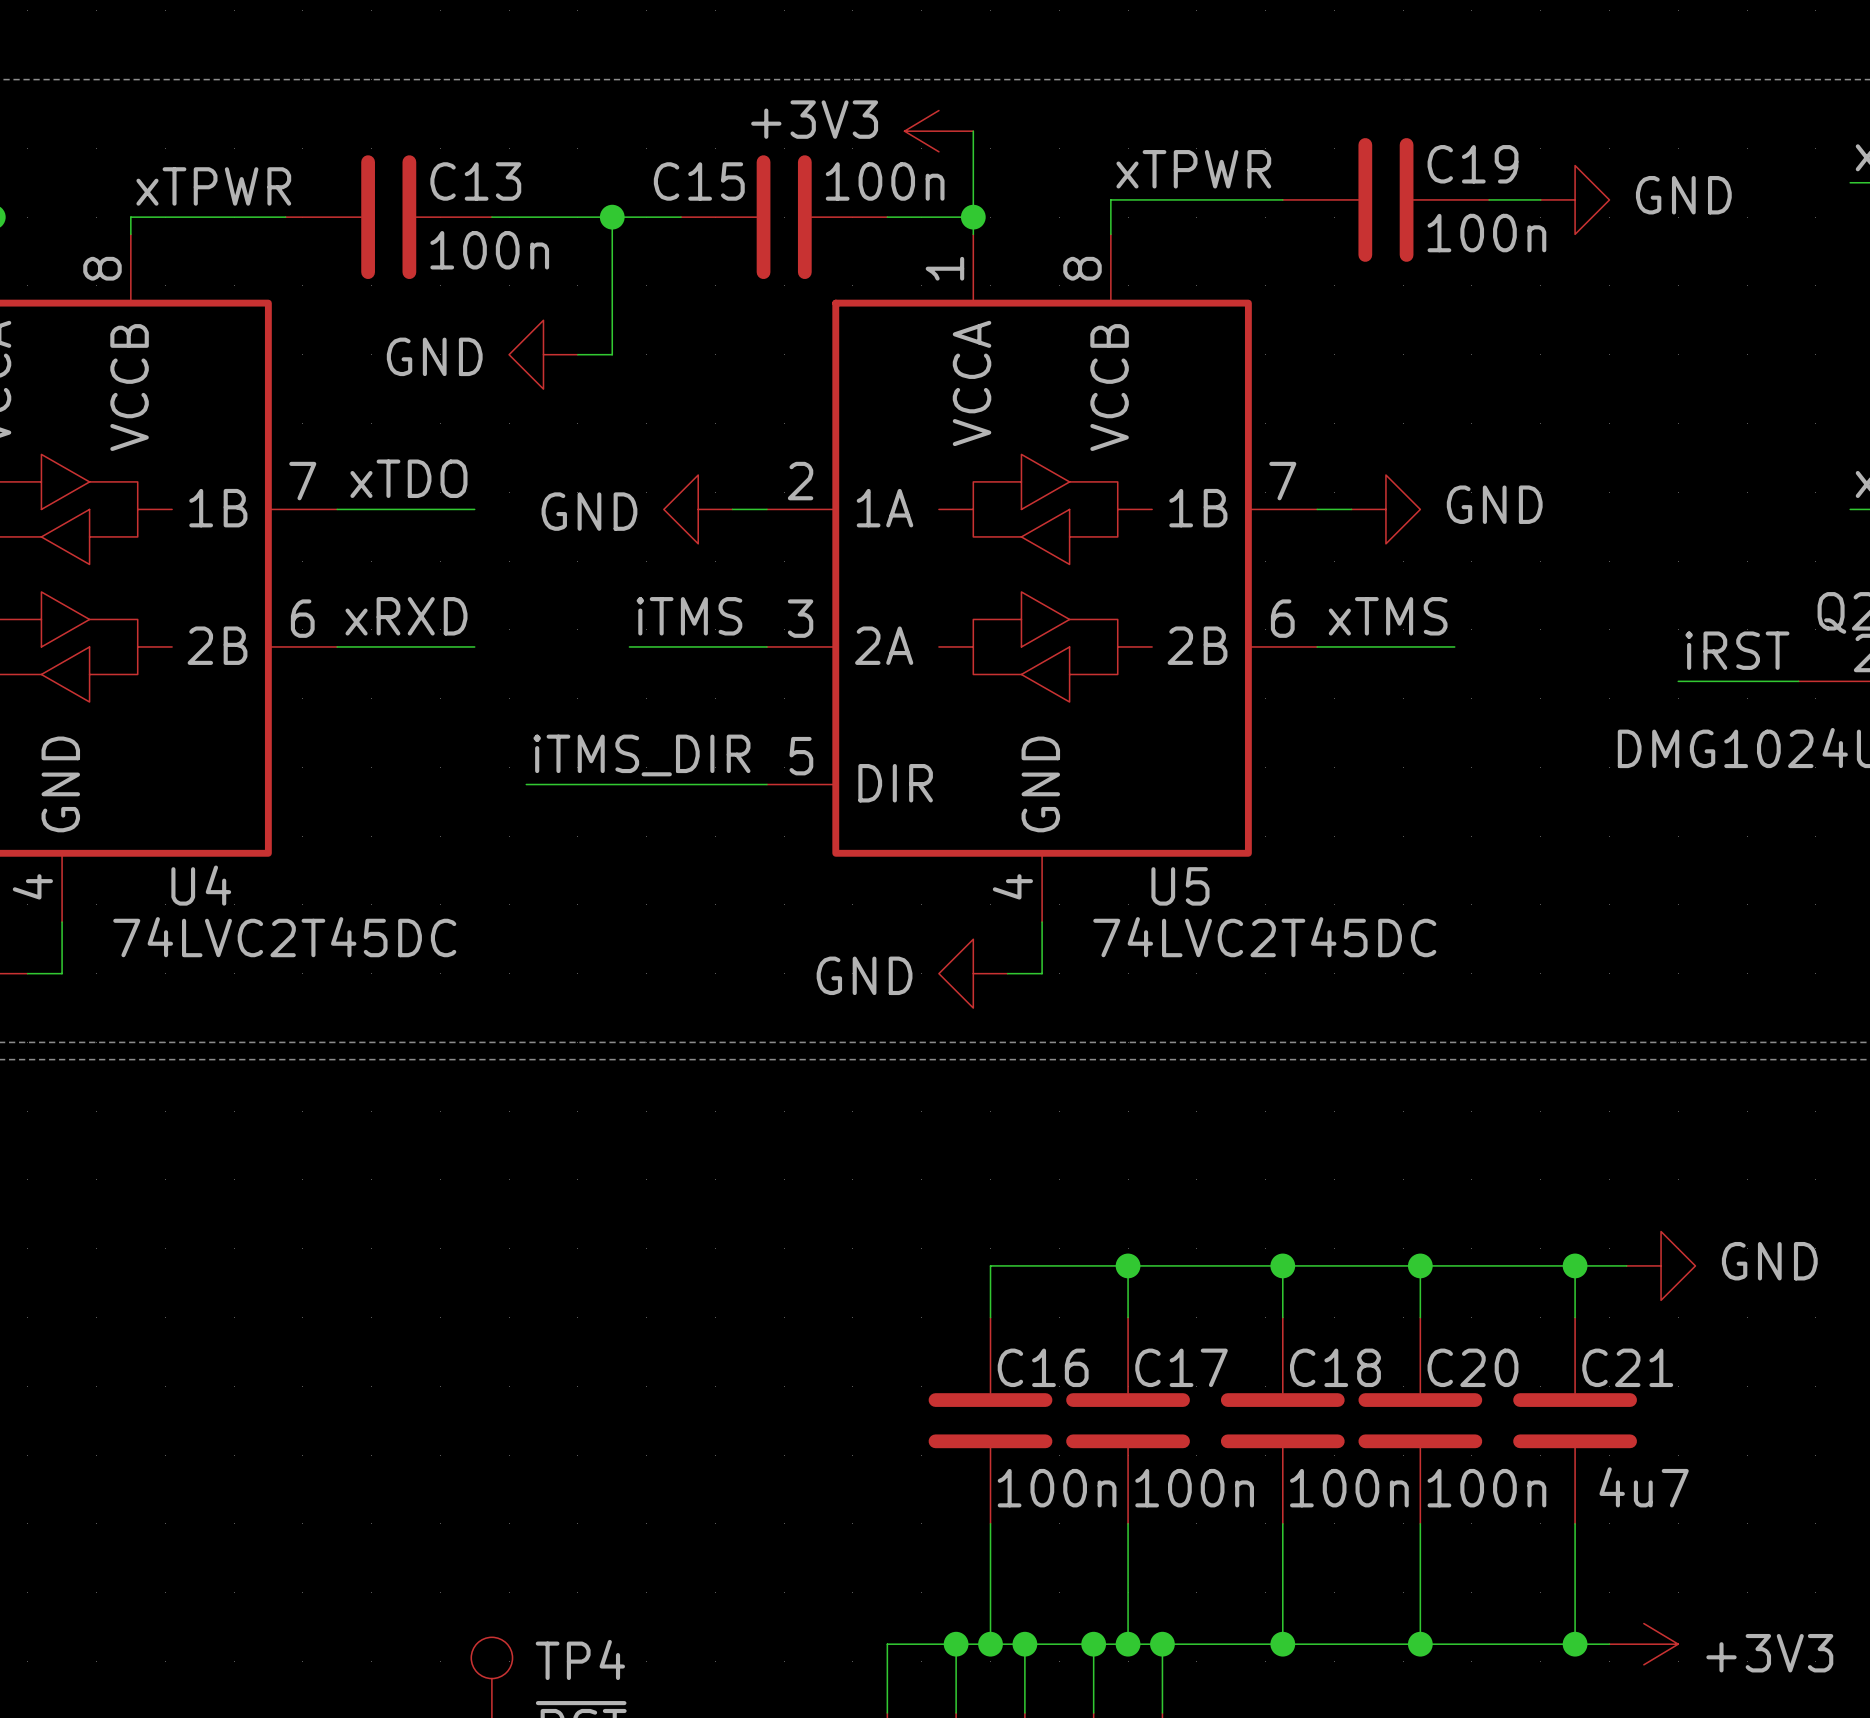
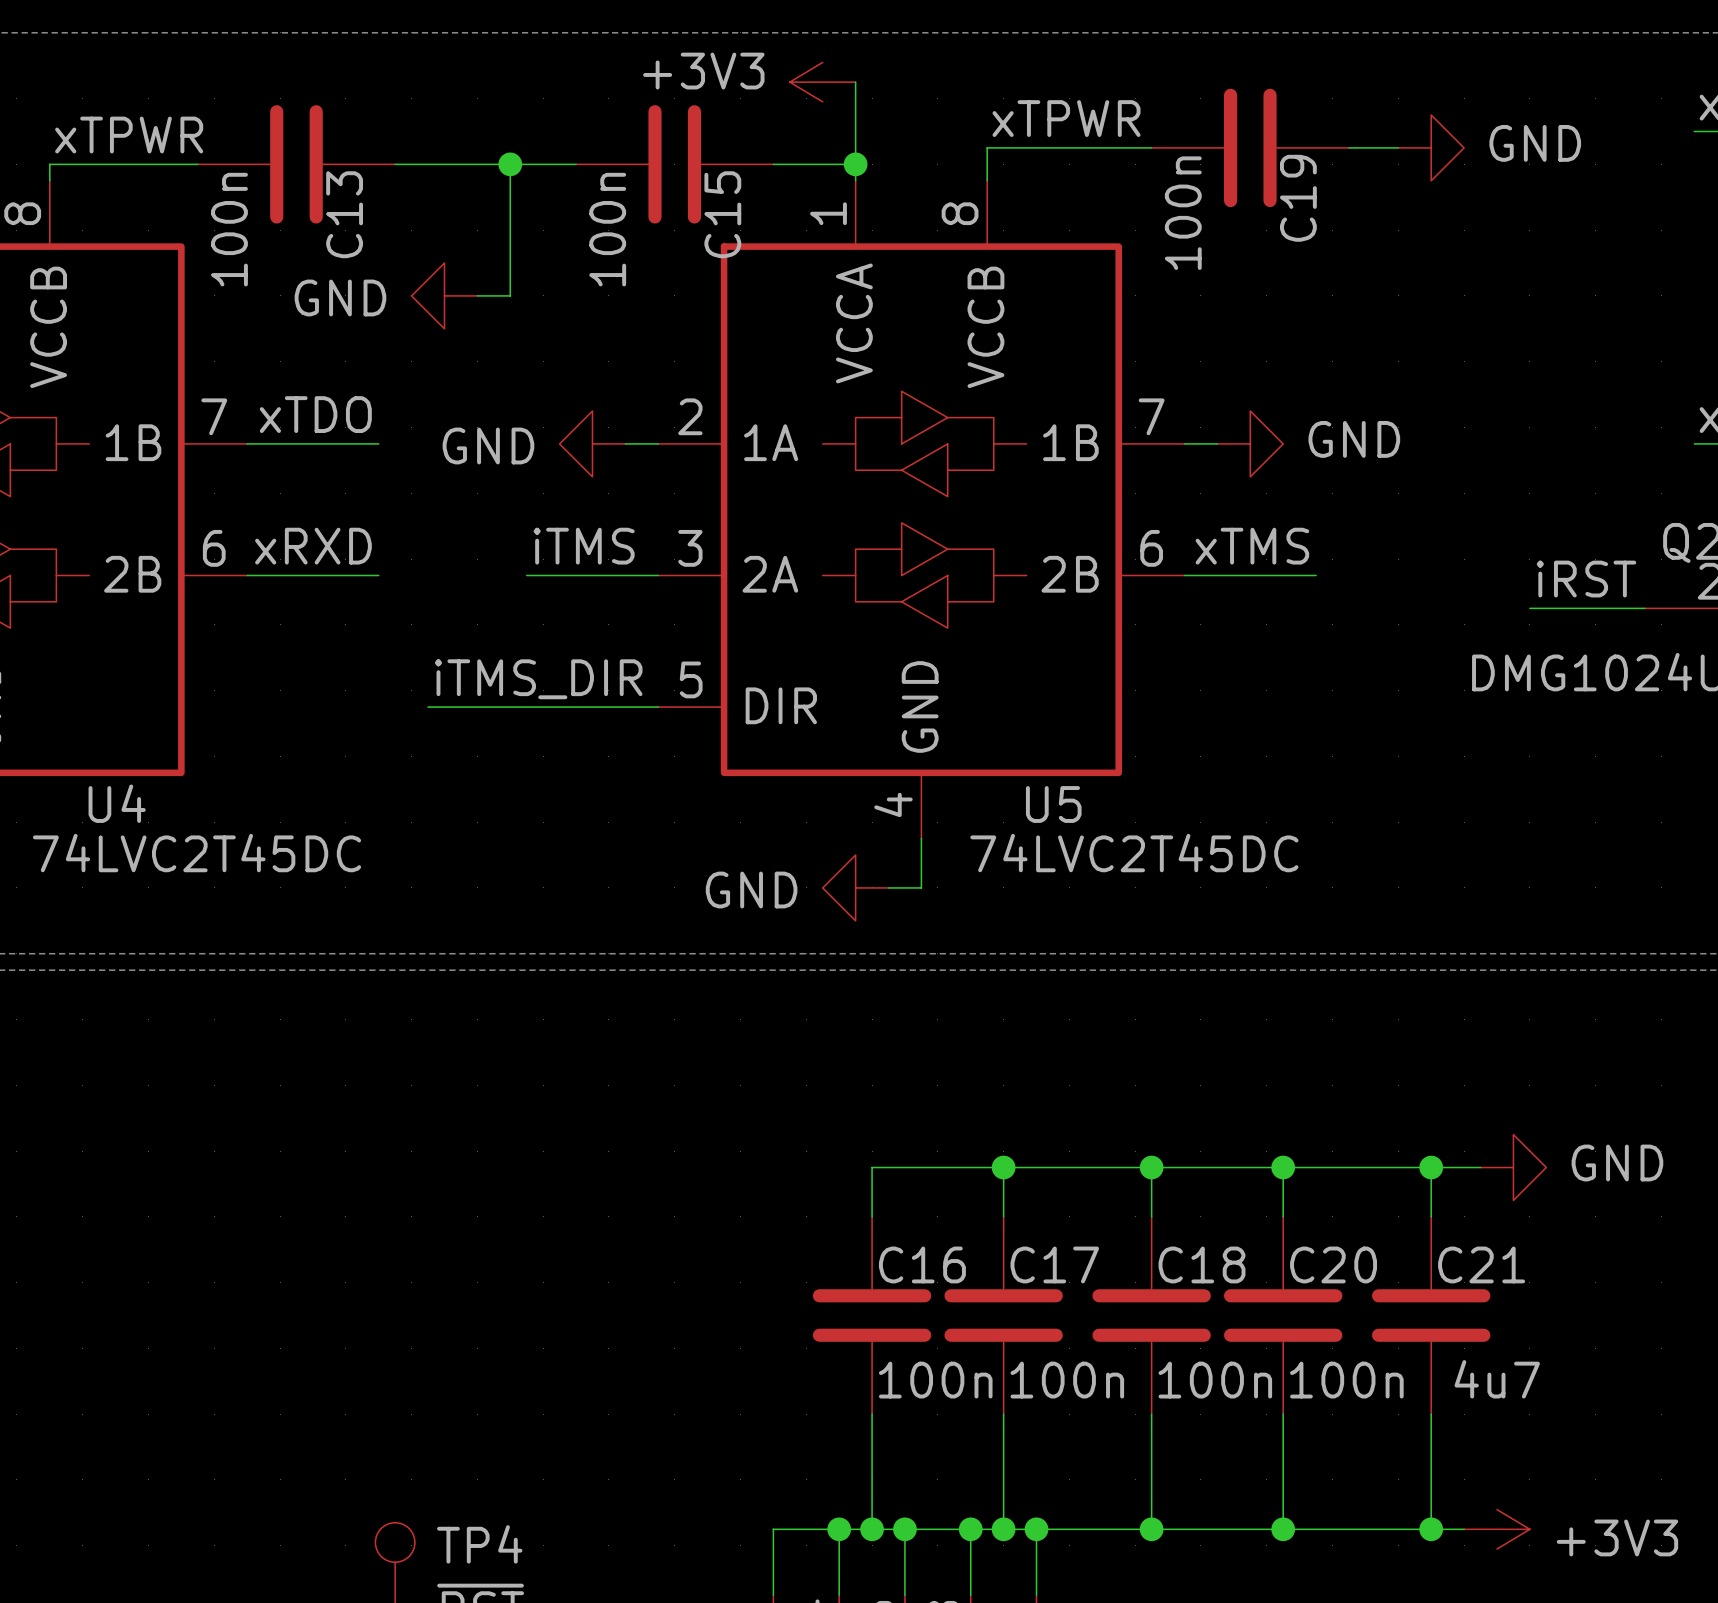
C19 name rotation: 0° (1473, 164) -> 90° counterclockwise (1298, 198)
C13 name rotation: 0° (475, 181) -> 90° counterclockwise (344, 214)
C15 name rotation: 0° (699, 181) -> 90° counterclockwise (722, 214)
C15 name position: C15 (699, 181) -> C15 (722, 214)
C15 value rotation: 0° (885, 181) -> 90° counterclockwise (607, 229)
C15 value position: 100n (885, 181) -> 100n (607, 229)
C19 value rotation: 0° (1486, 233) -> 90° counterclockwise (1183, 213)
C19 value position: 100n (1486, 233) -> 100n (1183, 213)
C13 value rotation: 0° (489, 250) -> 90° counterclockwise (229, 229)
C13 value position: 100n (489, 250) -> 100n (229, 229)

